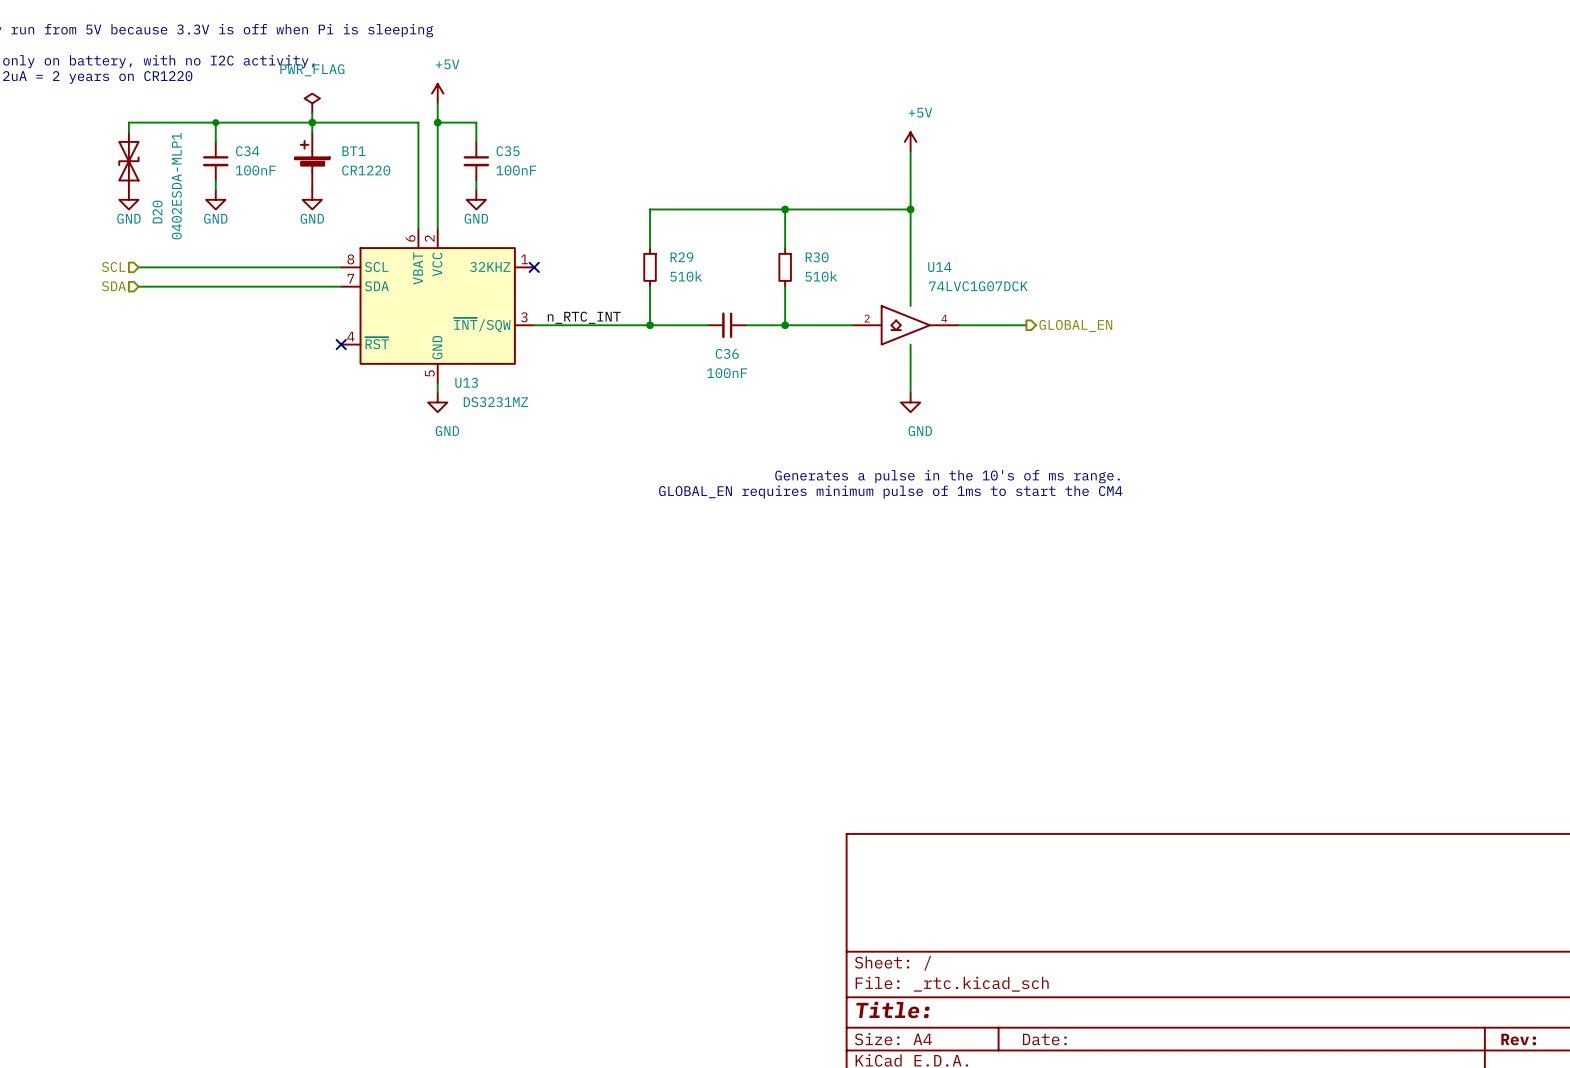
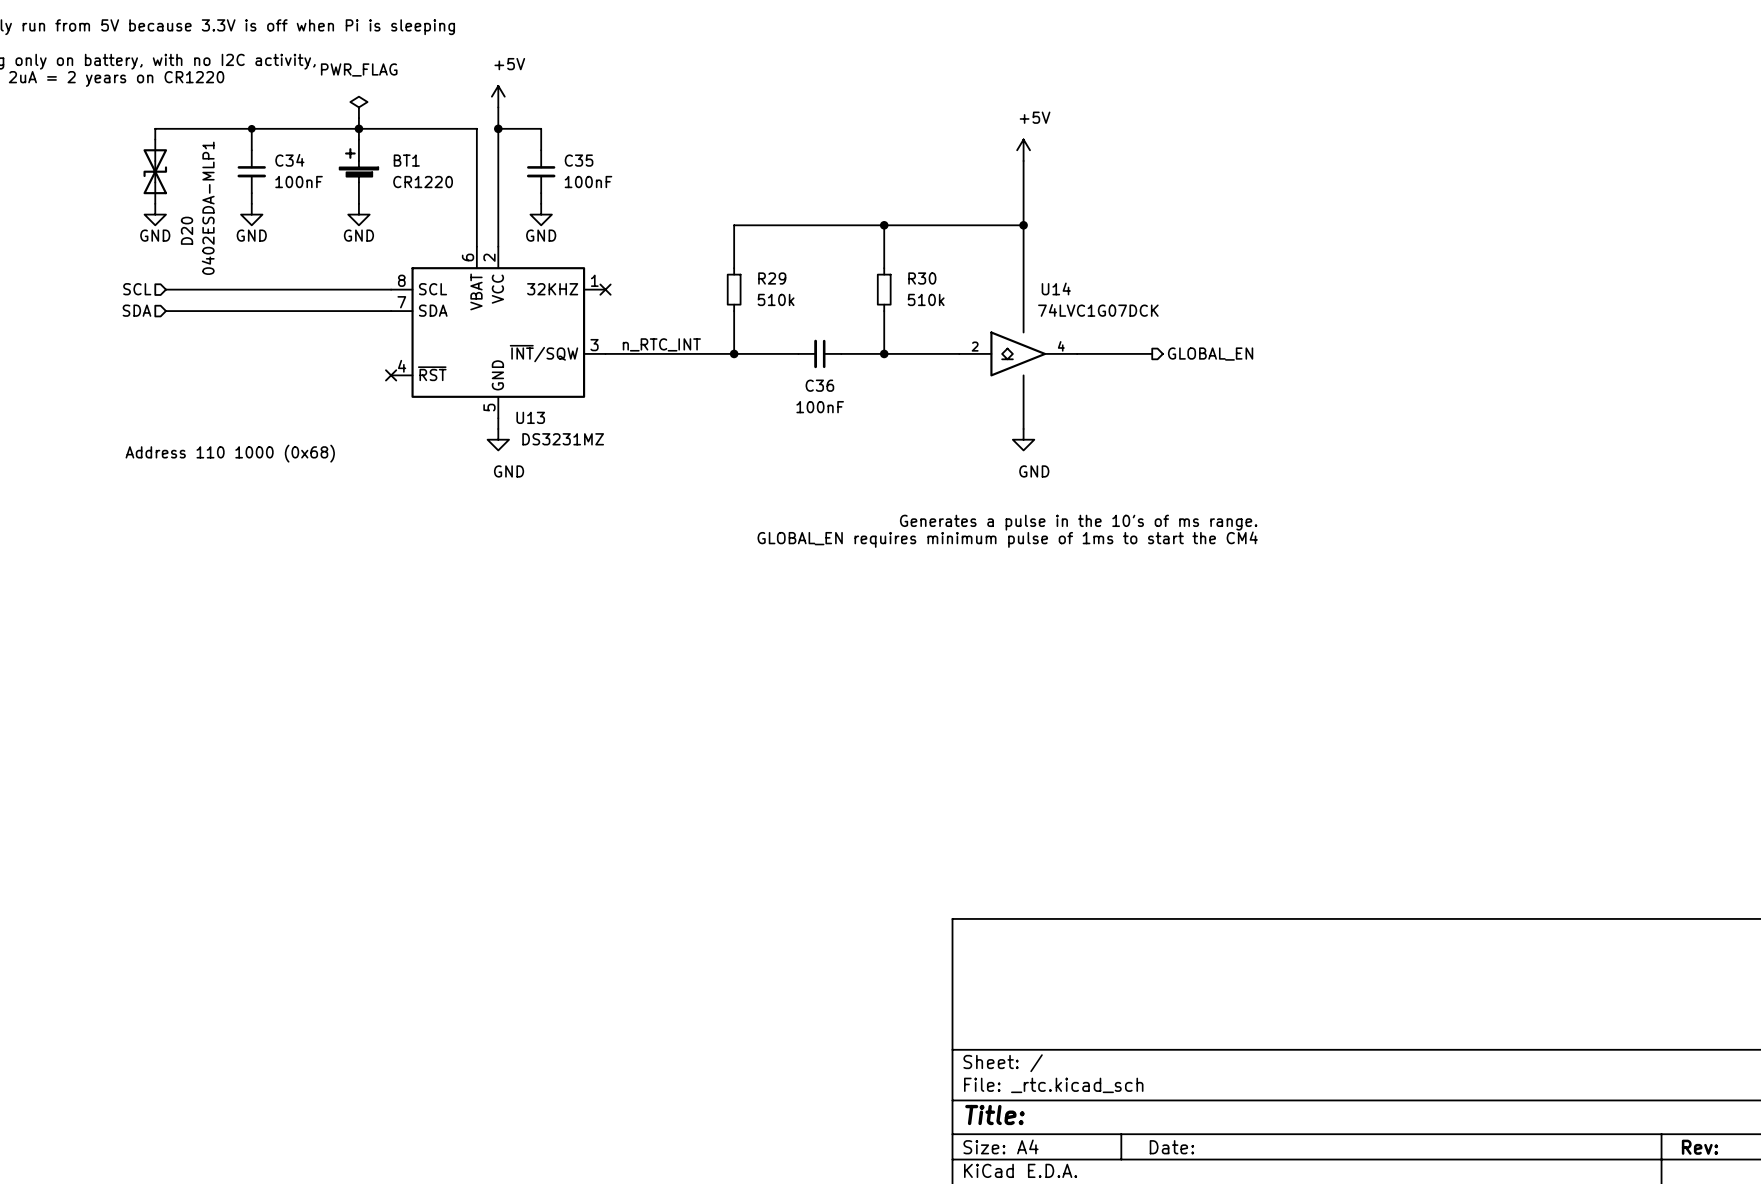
text: none -> Address 110 1000 (0x68) (230, 453)

